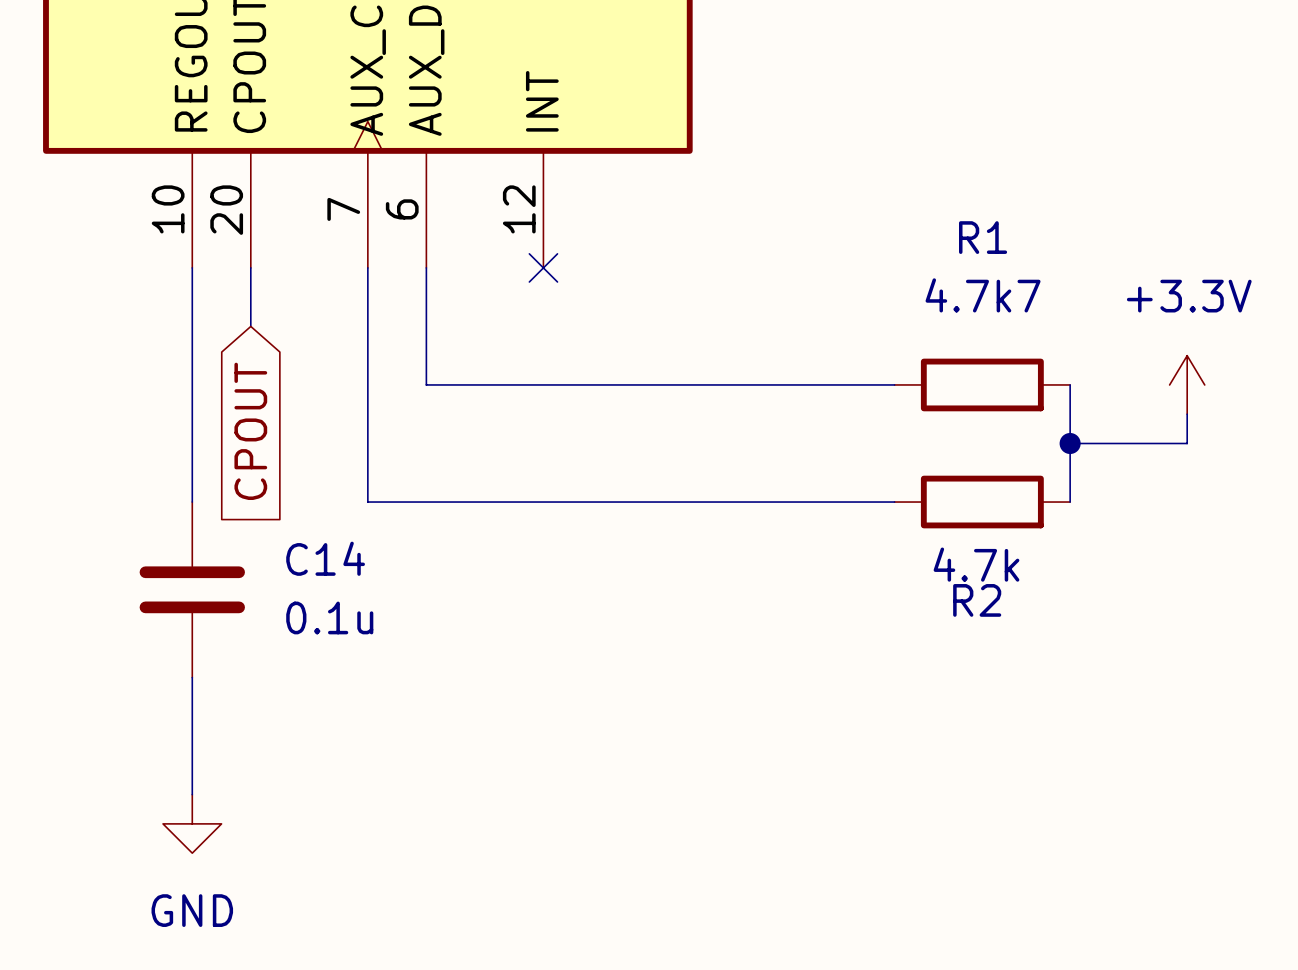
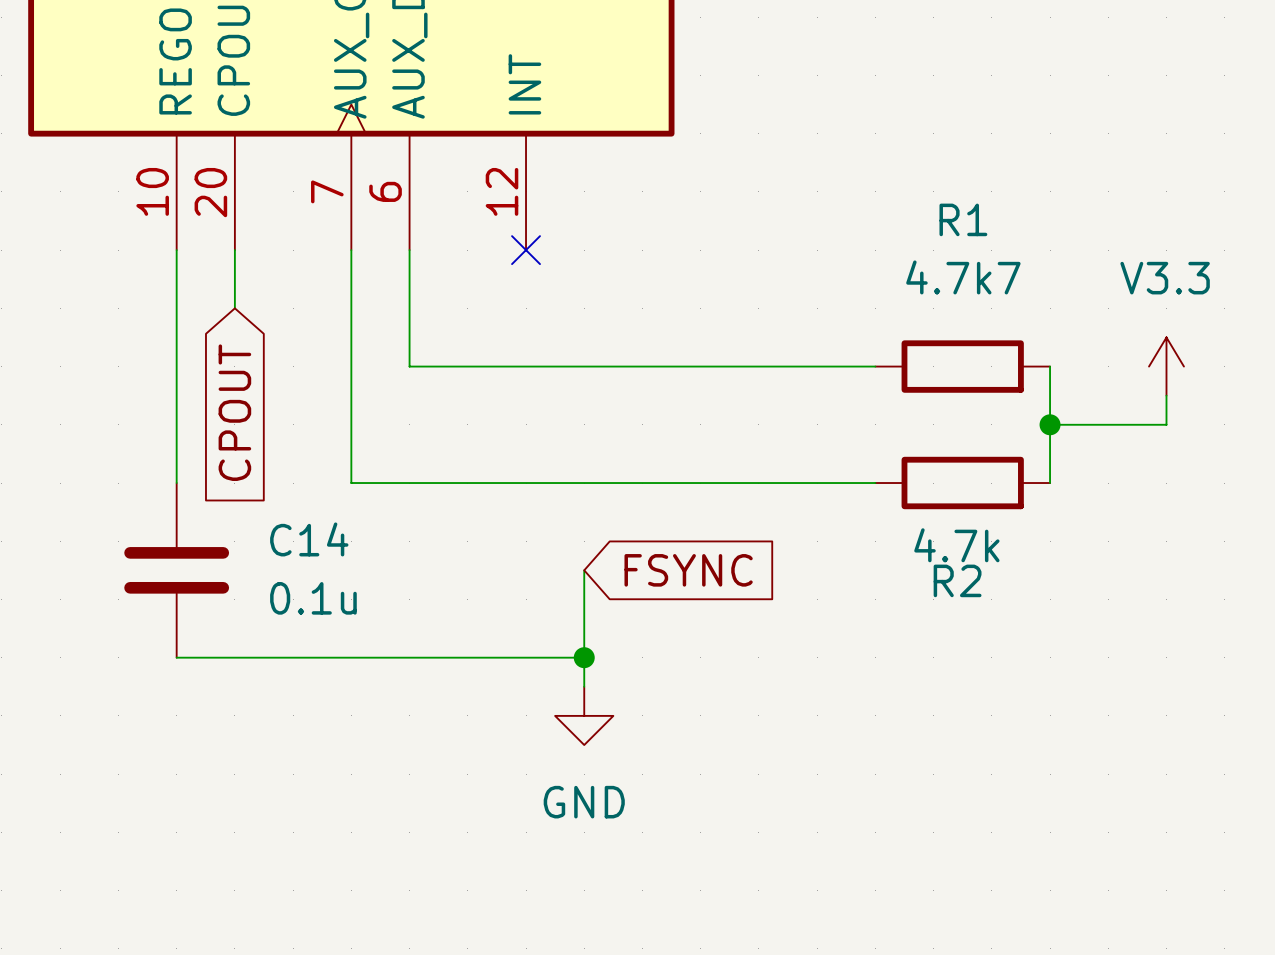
power symbol: +3.3V (1187, 384) -> V3.3 (1166, 366)
wire: none -> (584, 570) (584, 686)
global label: none -> FSYNC (688, 570)
wire: (192, 677) (192, 794) -> (176, 657) (584, 657)
junction: none -> (584, 657)
power symbol position: GND (192, 823) -> GND (584, 715)

